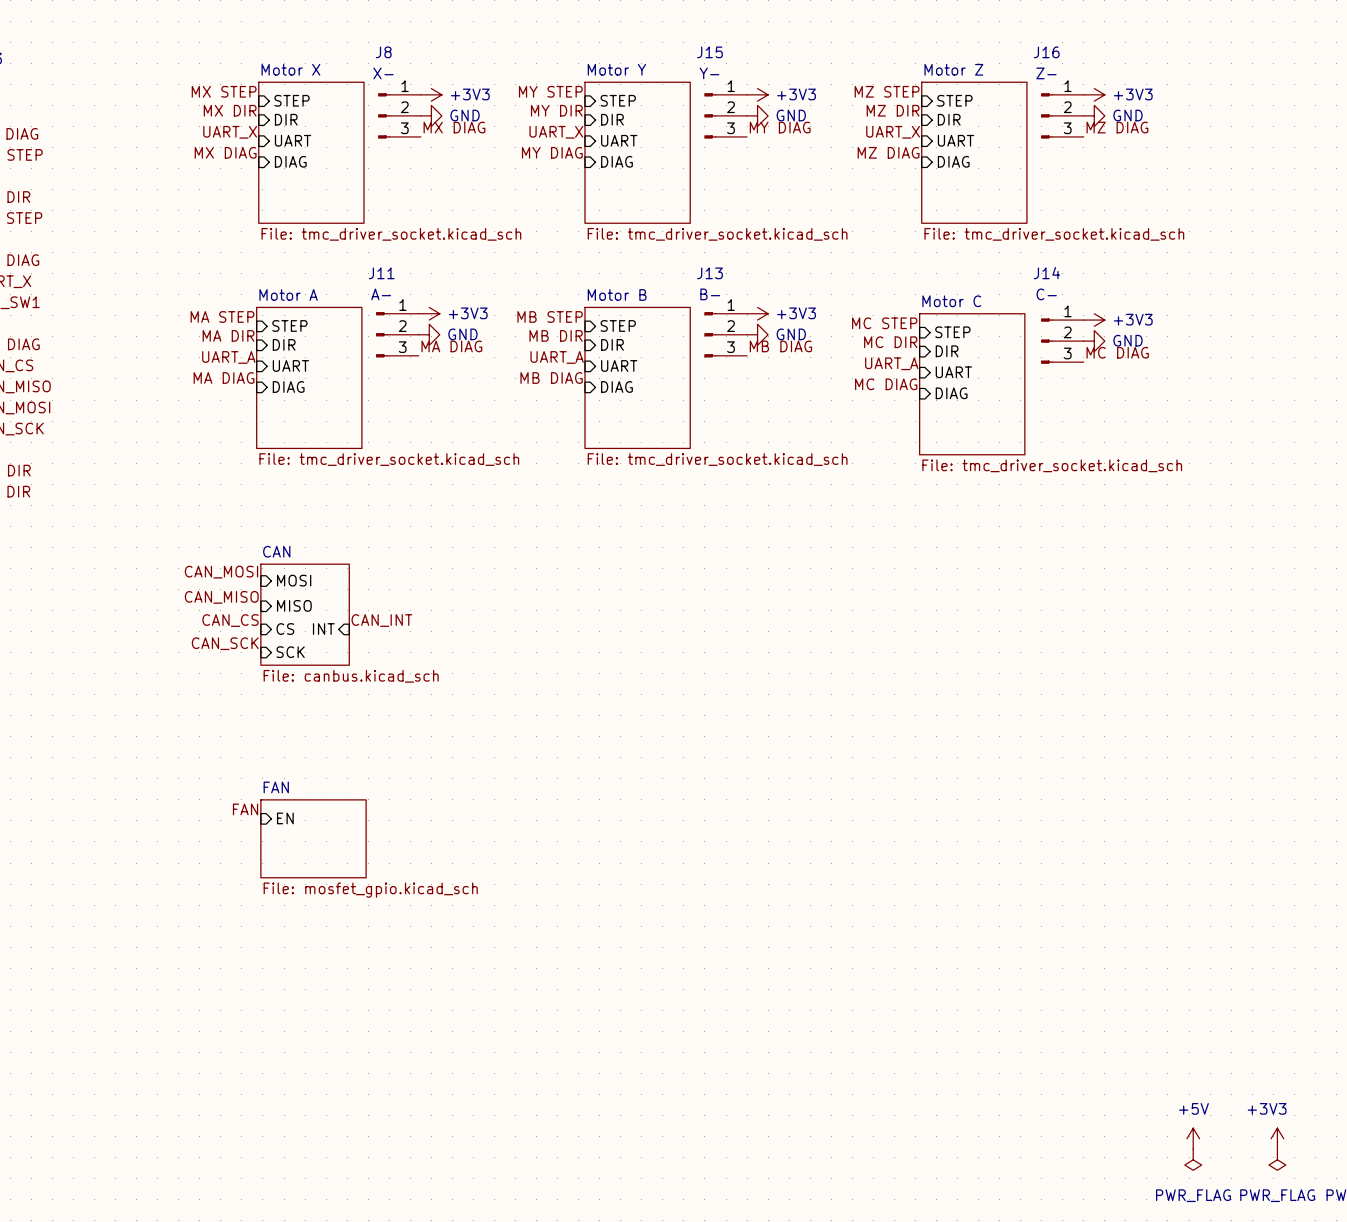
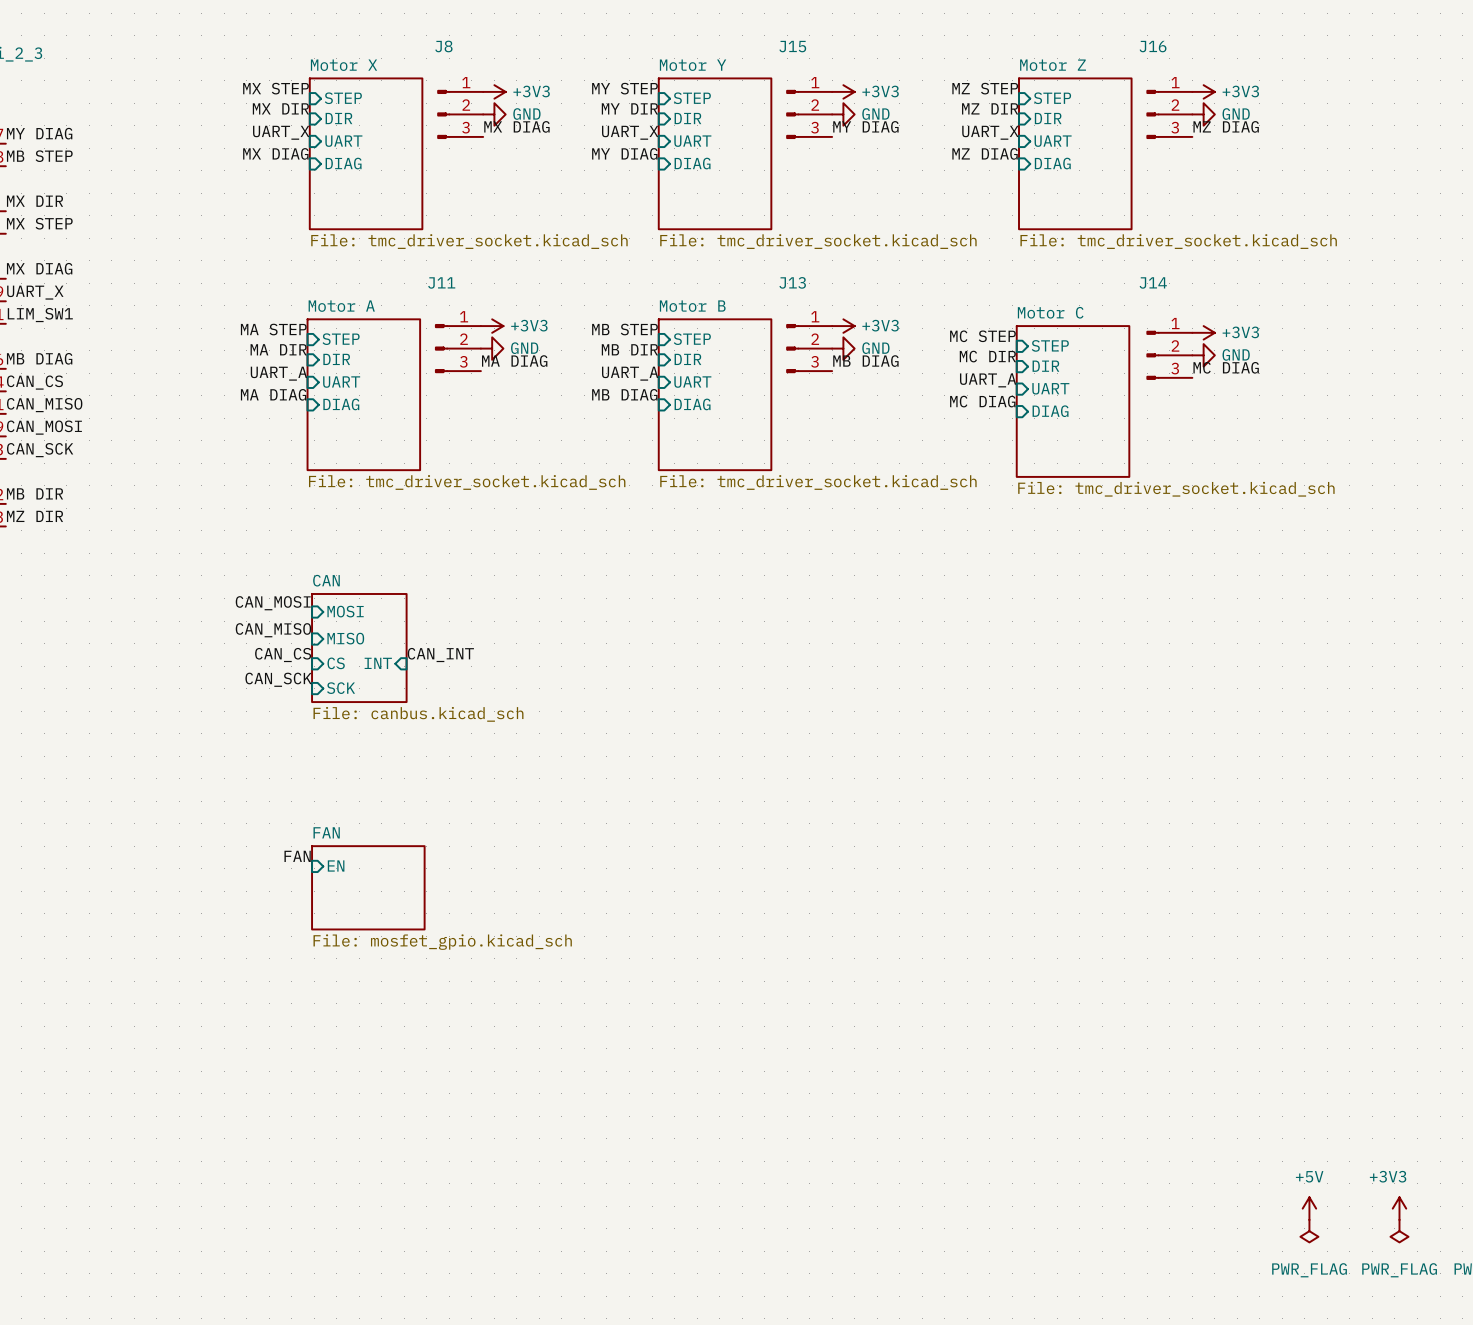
J8 value: X- (383, 73) -> none
J15 value: Y- (709, 73) -> none
J16 value: Z- (1046, 73) -> none
J11 value: A- (381, 294) -> none
J13 value: B- (710, 294) -> none
J14 value: C- (1046, 294) -> none

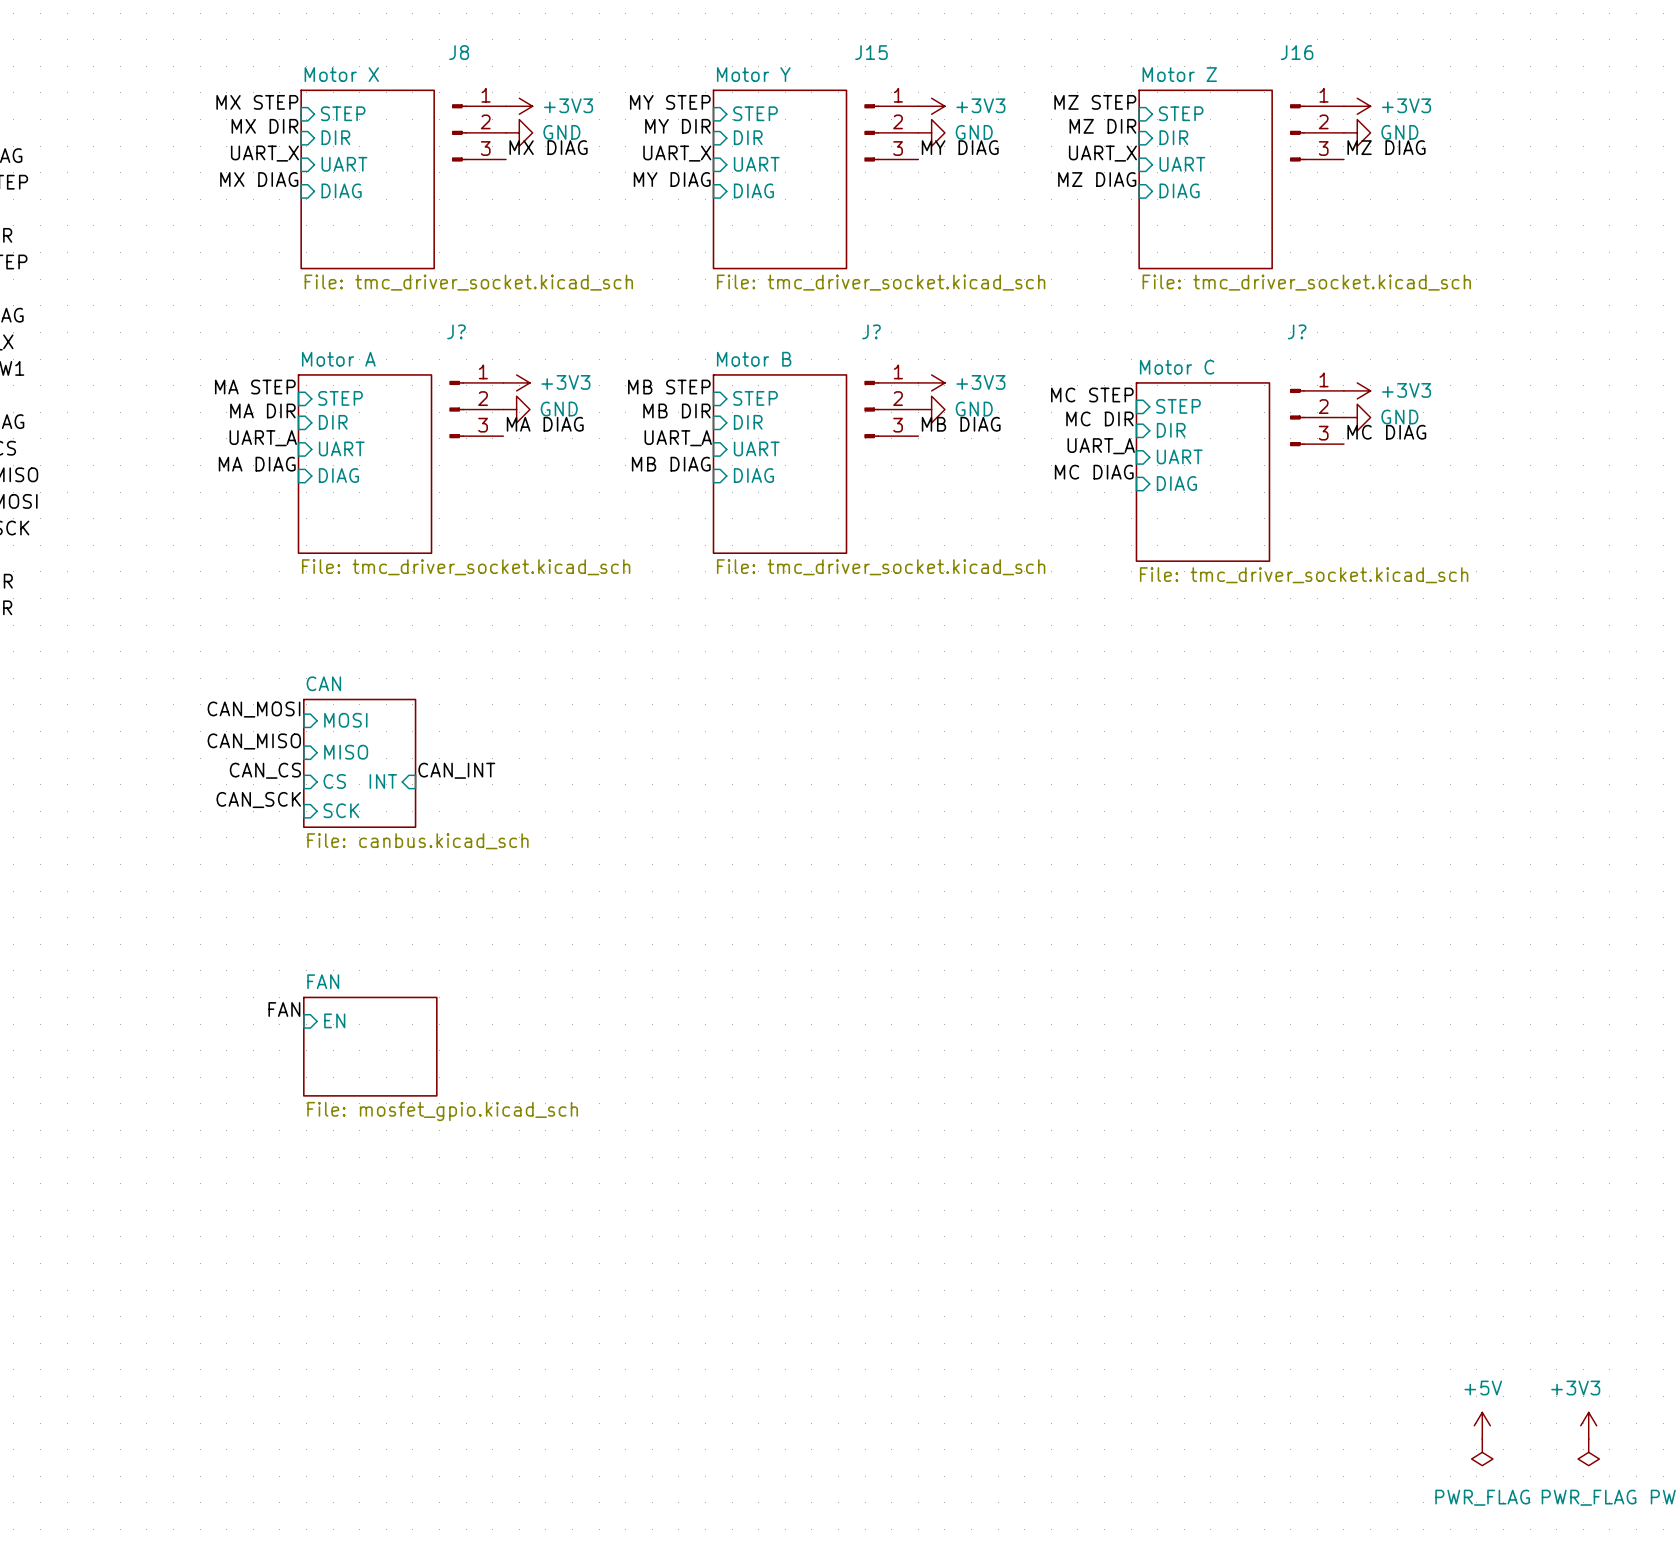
J11 name: J11 (441, 282) -> J? (456, 331)
J13 name: J13 (792, 282) -> J? (871, 331)
J14 name: J14 (1153, 282) -> J? (1297, 331)

